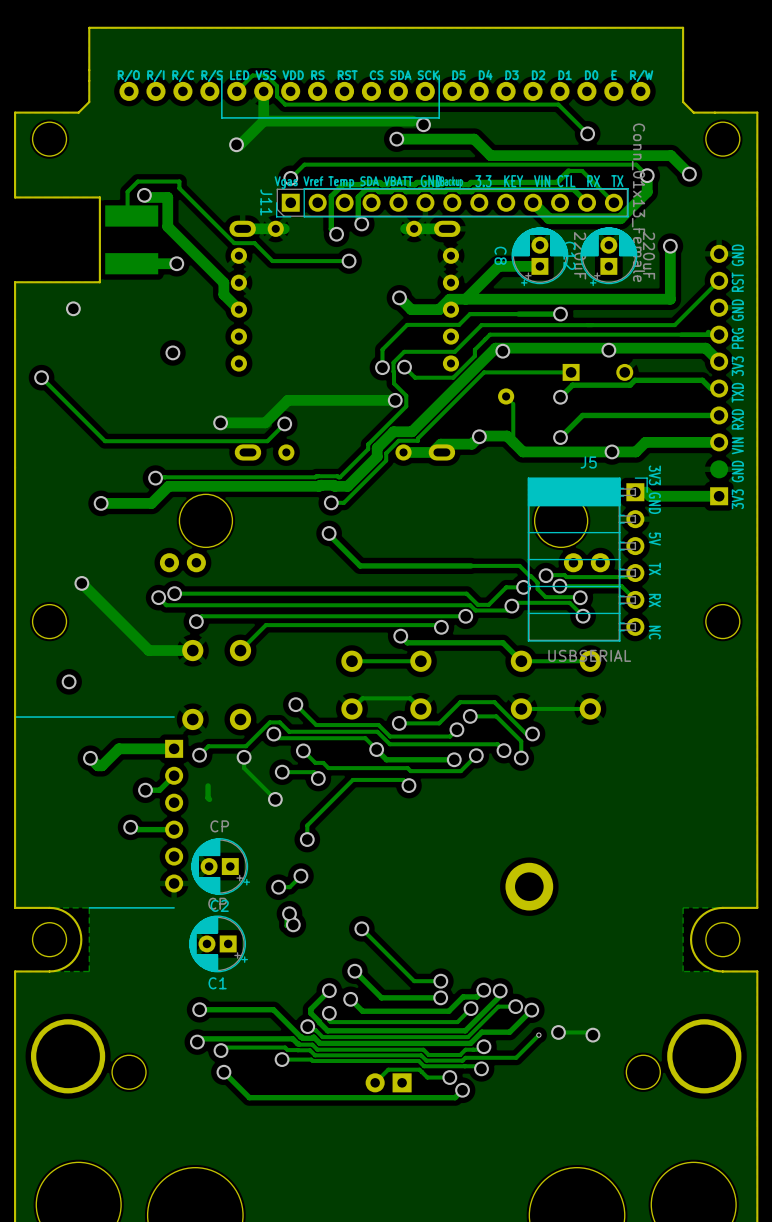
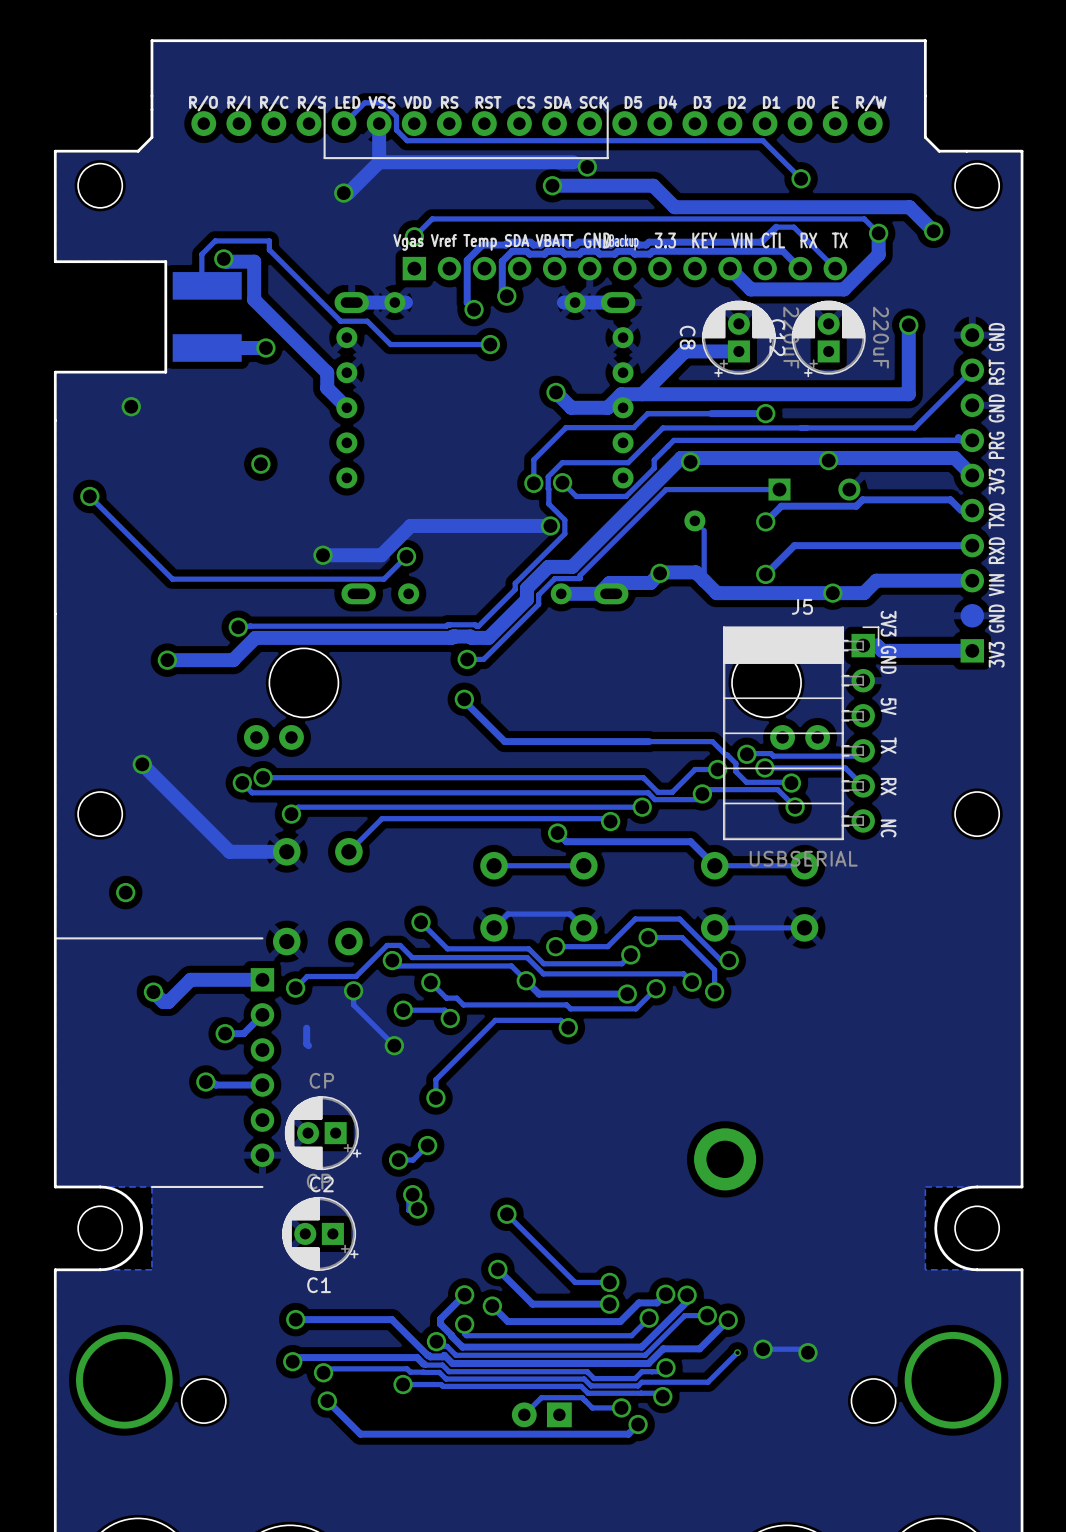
J11 side: bottom (452, 202) -> top (624, 268)

